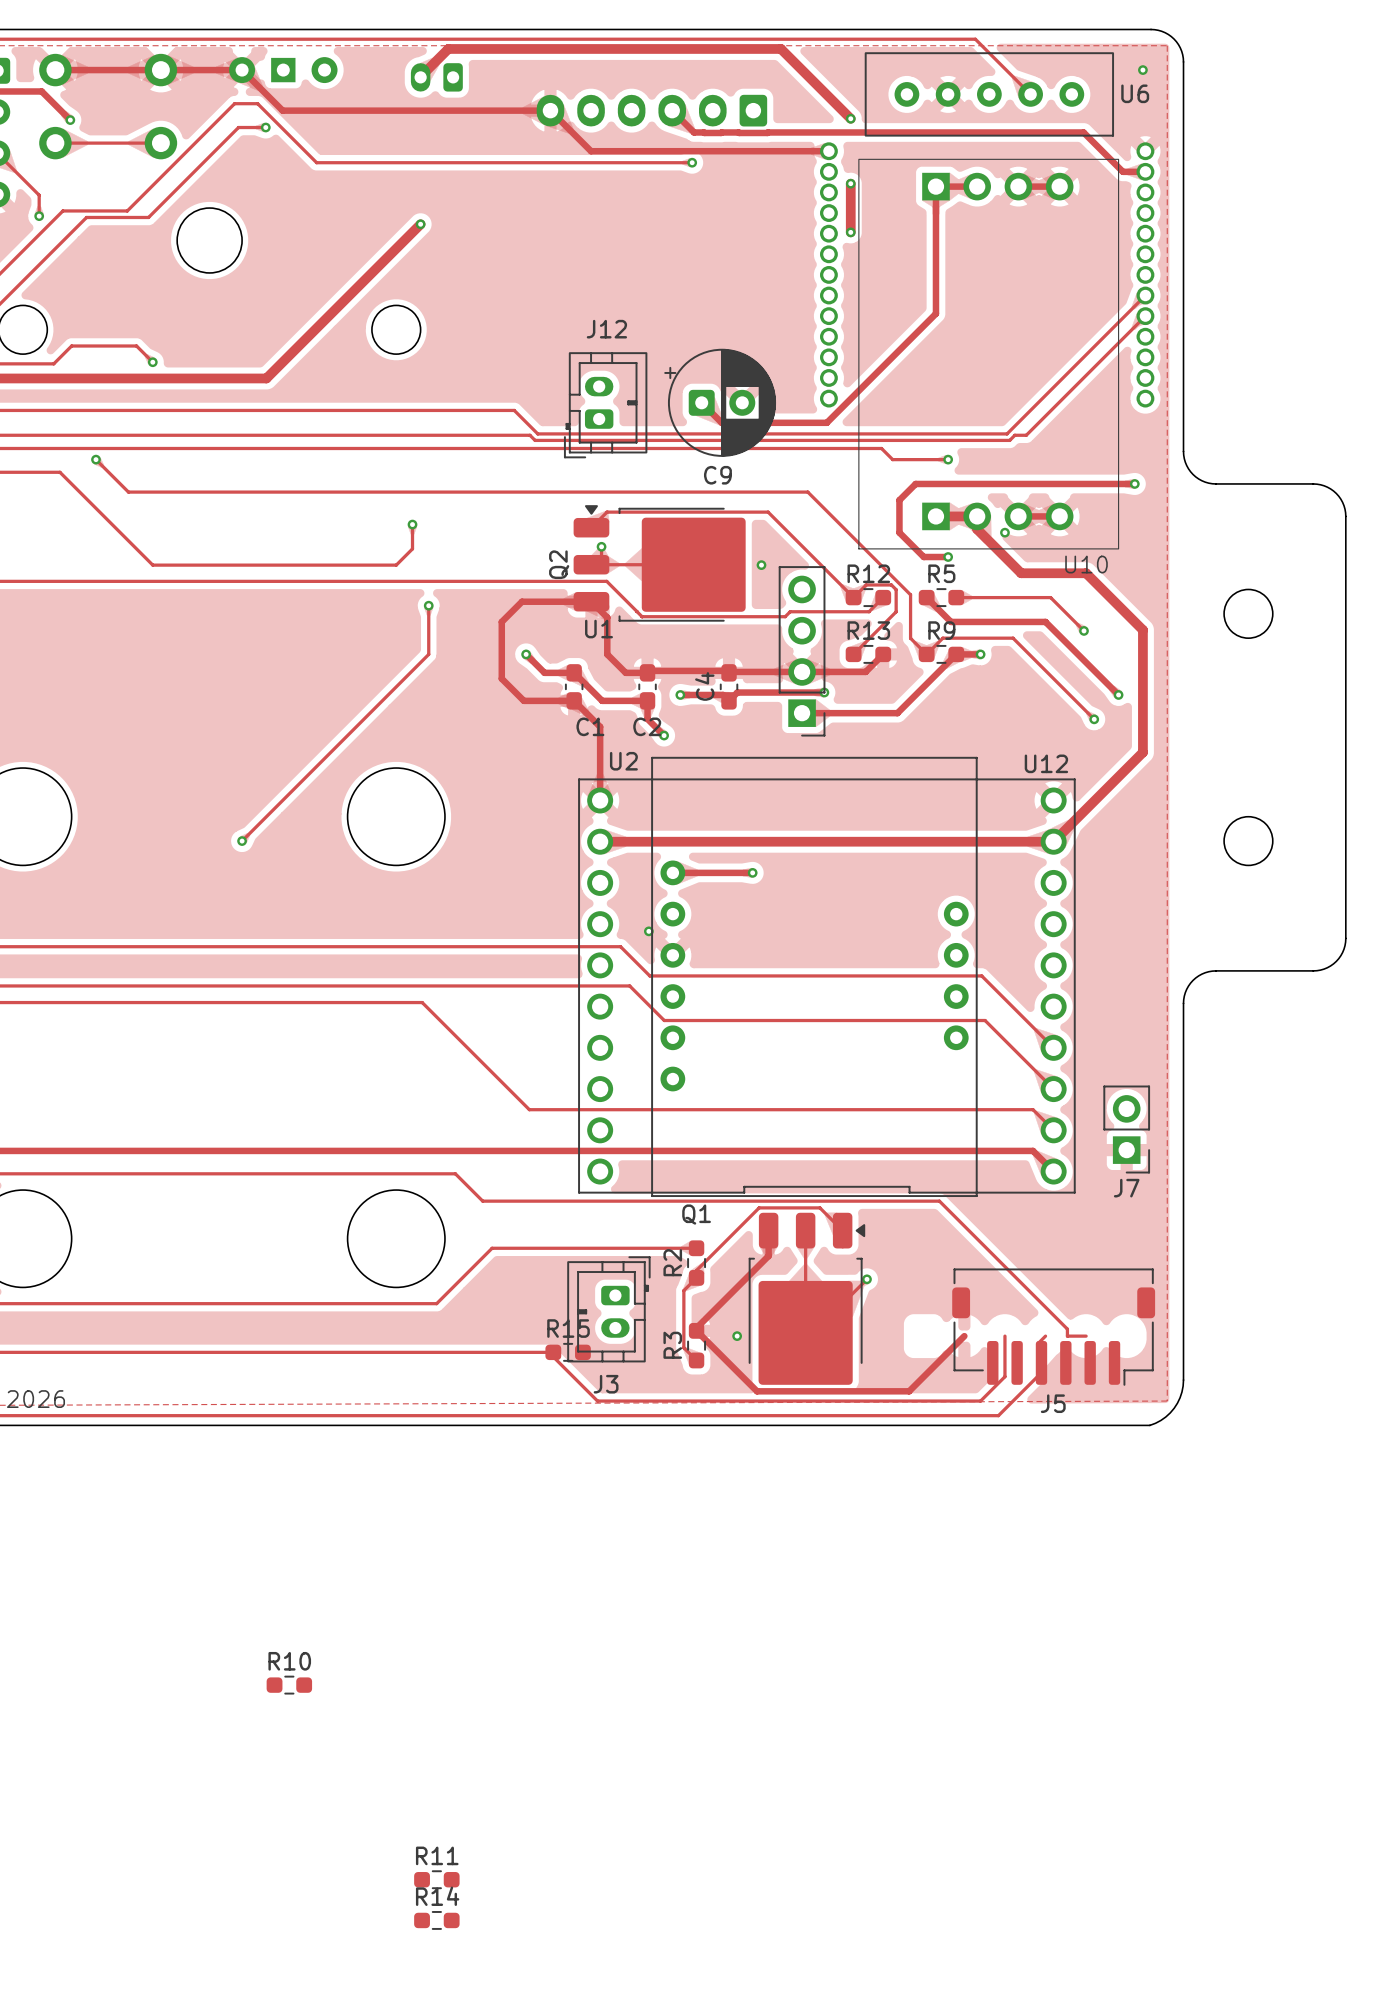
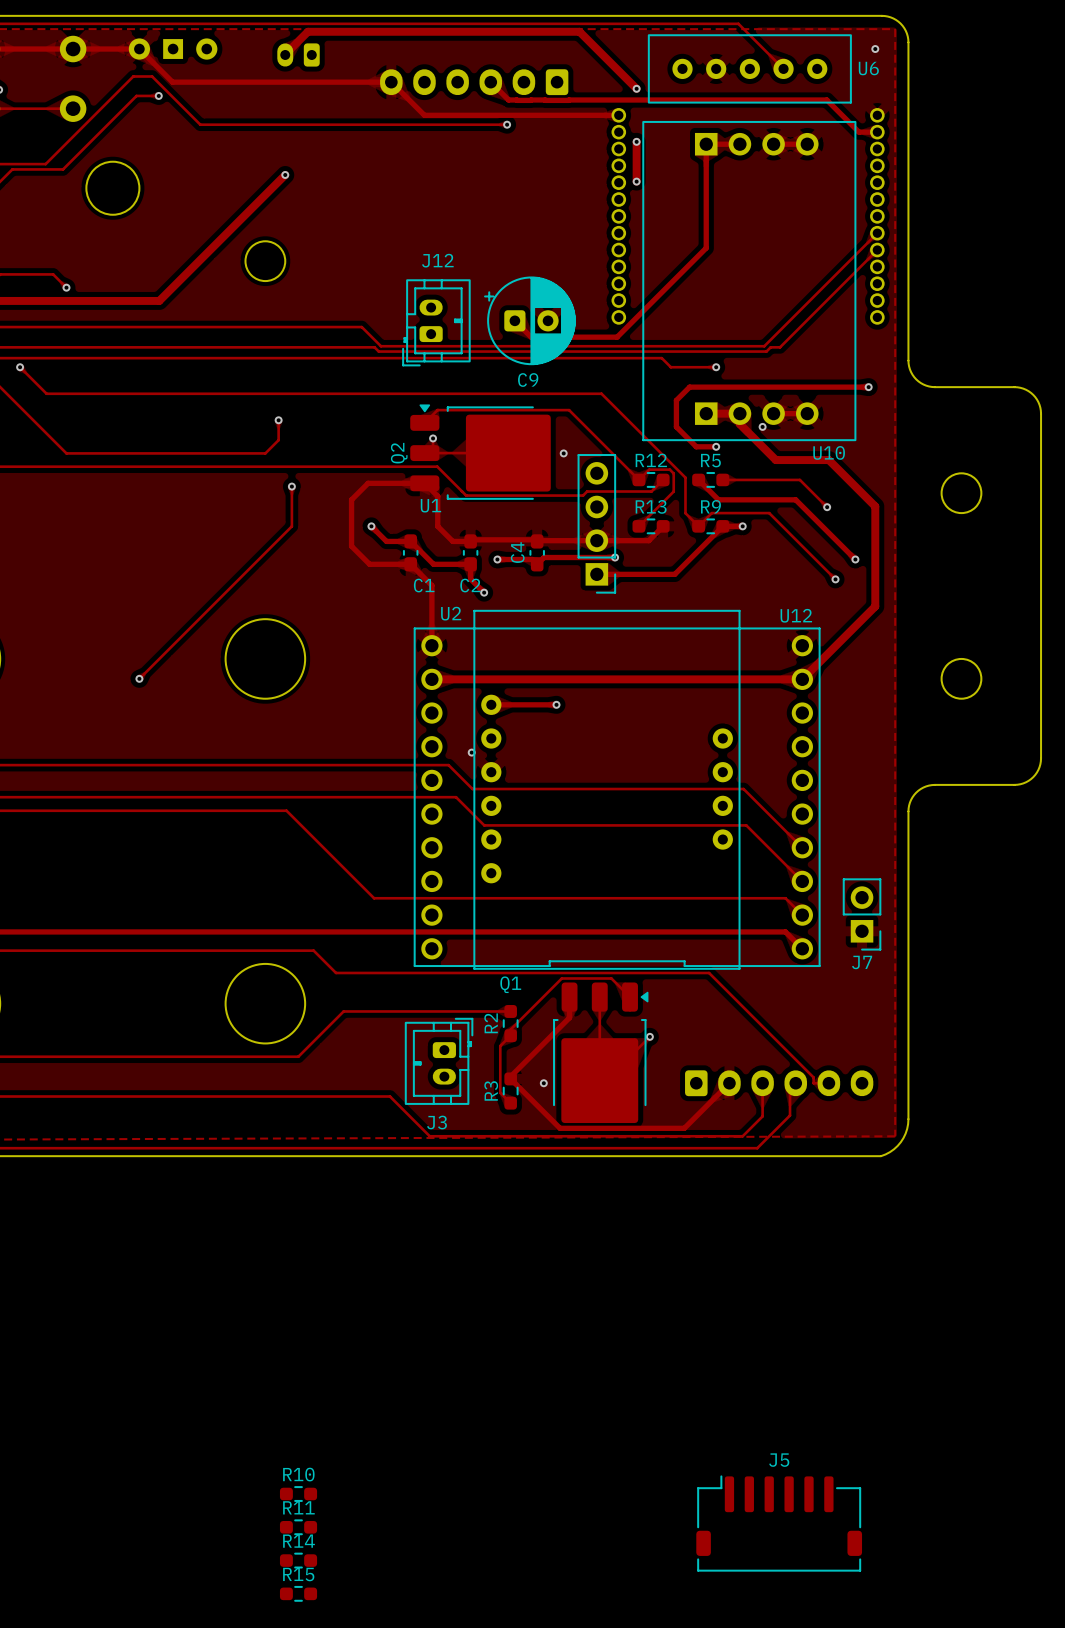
J5 rotation: 0° (1053, 1327) -> 180° (779, 1523)
J5 position: (1053, 1327) -> (779, 1523)
part: none -> (779, 1083)
R15 position: (568, 1352) -> (298, 1593)
R10 position: (289, 1685) -> (298, 1494)

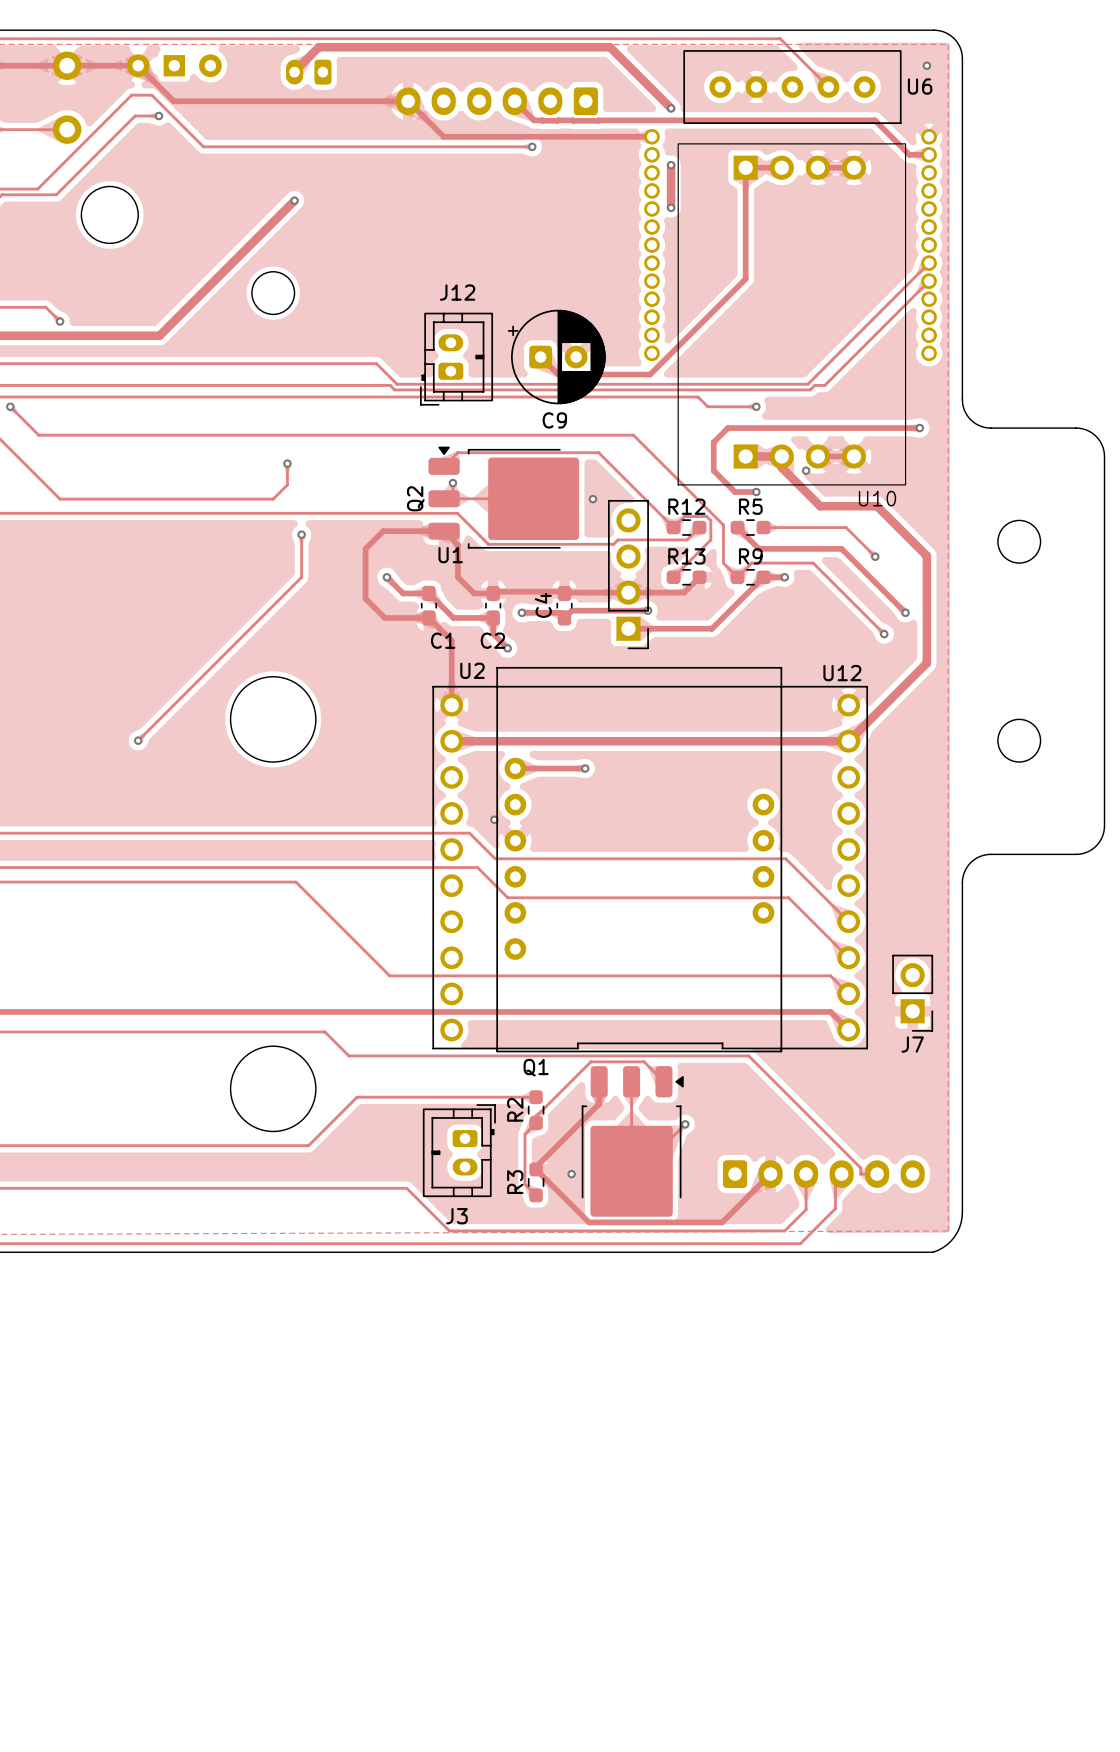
R10: (298, 1494) -> none
J5: (779, 1523) -> none
R11: (298, 1527) -> none
R14: (298, 1560) -> none
R15: (298, 1593) -> none

